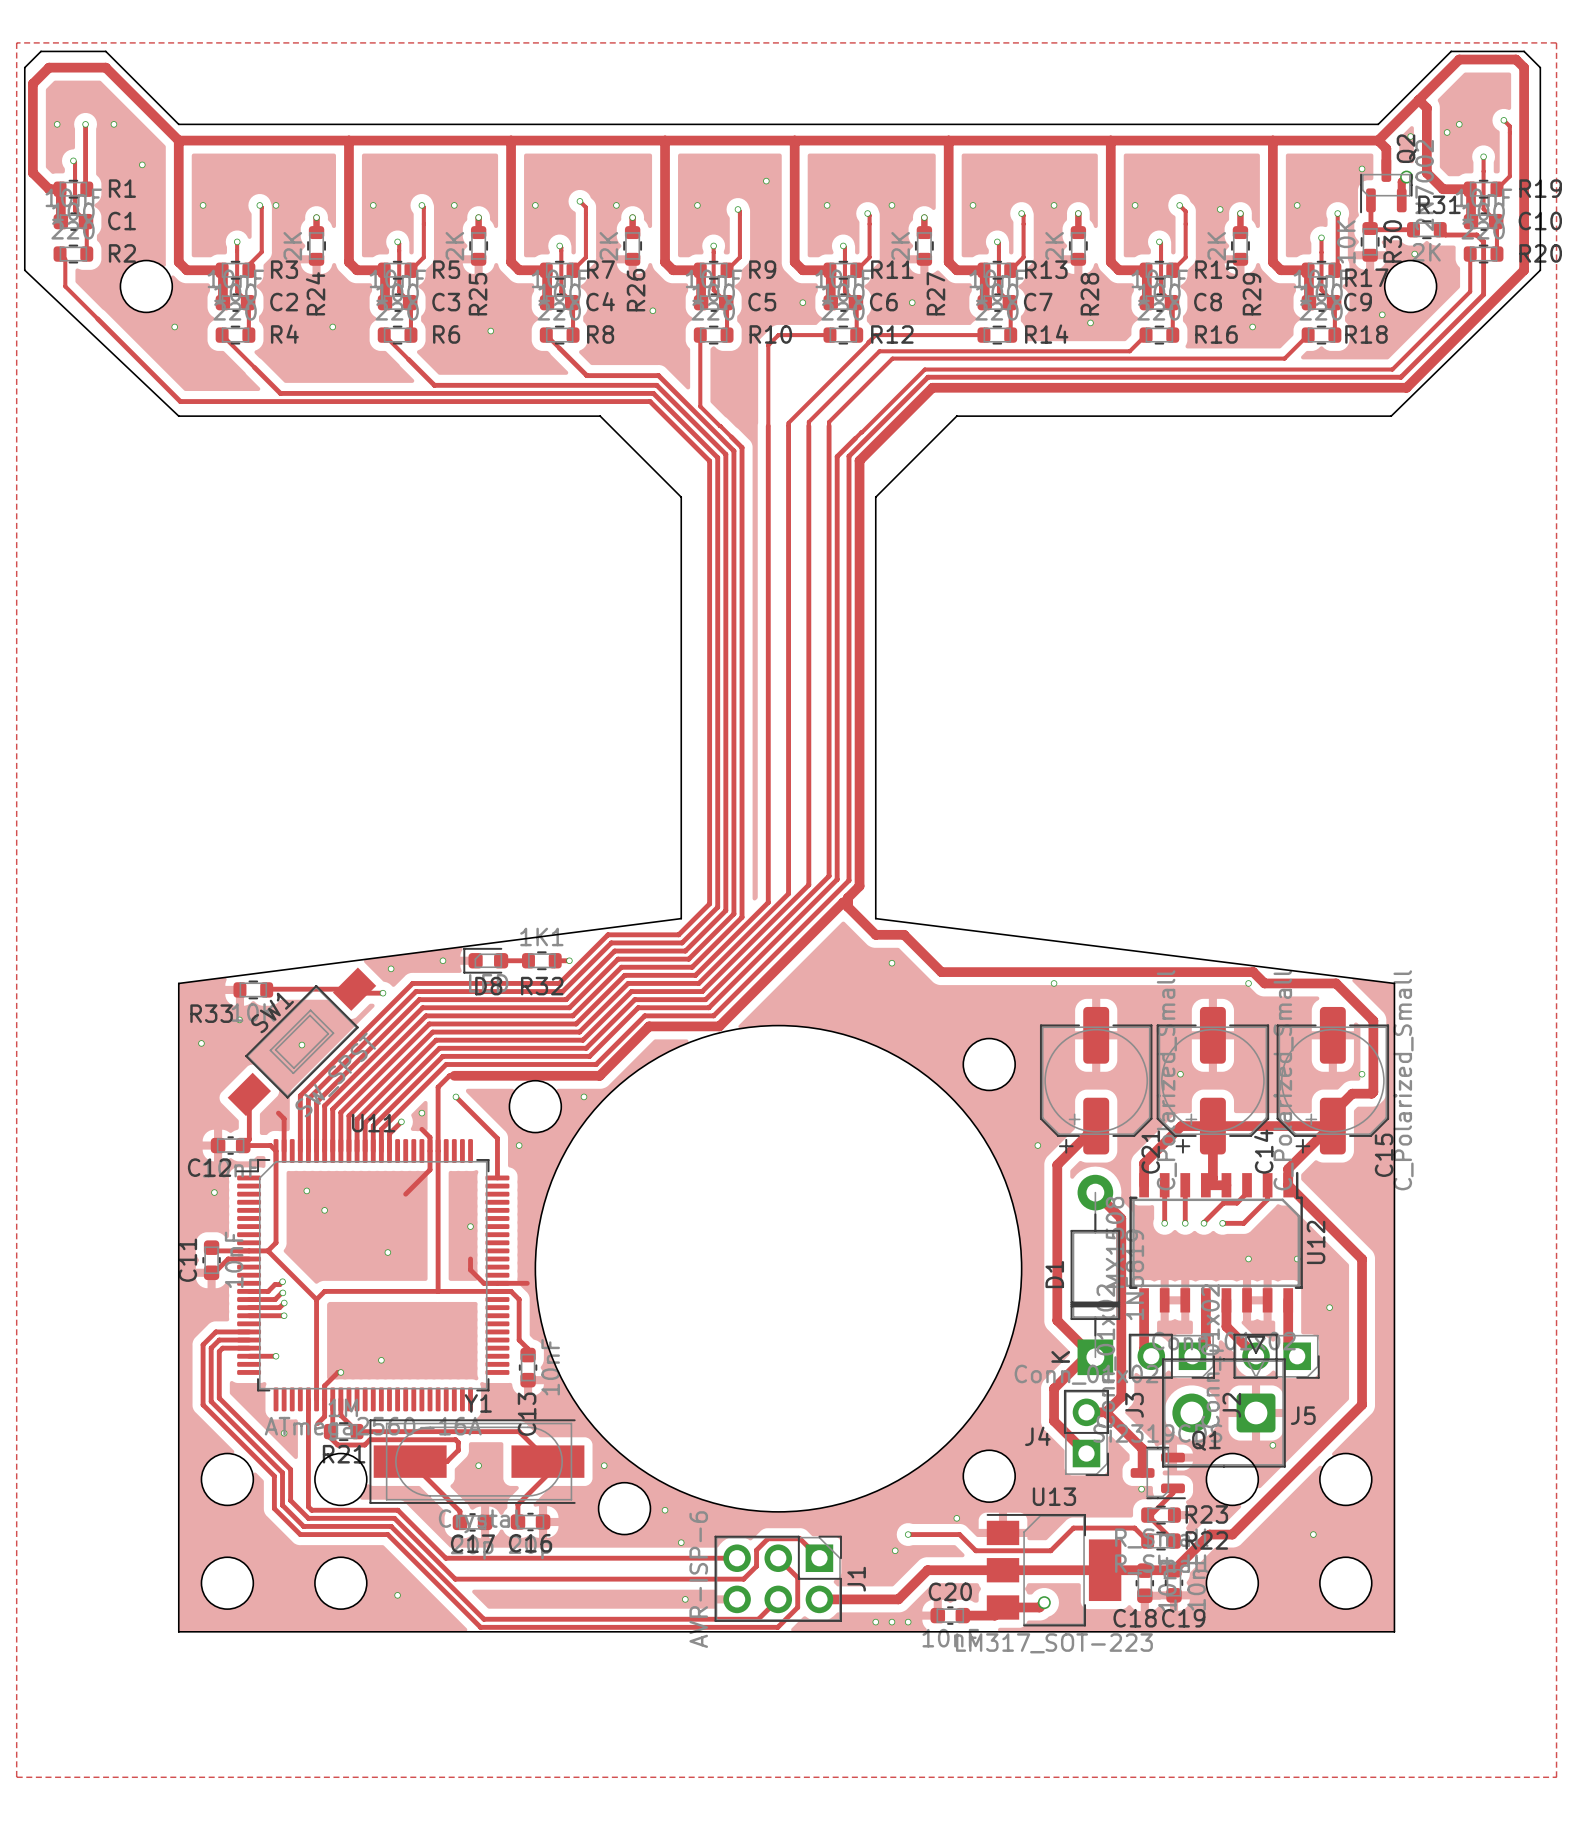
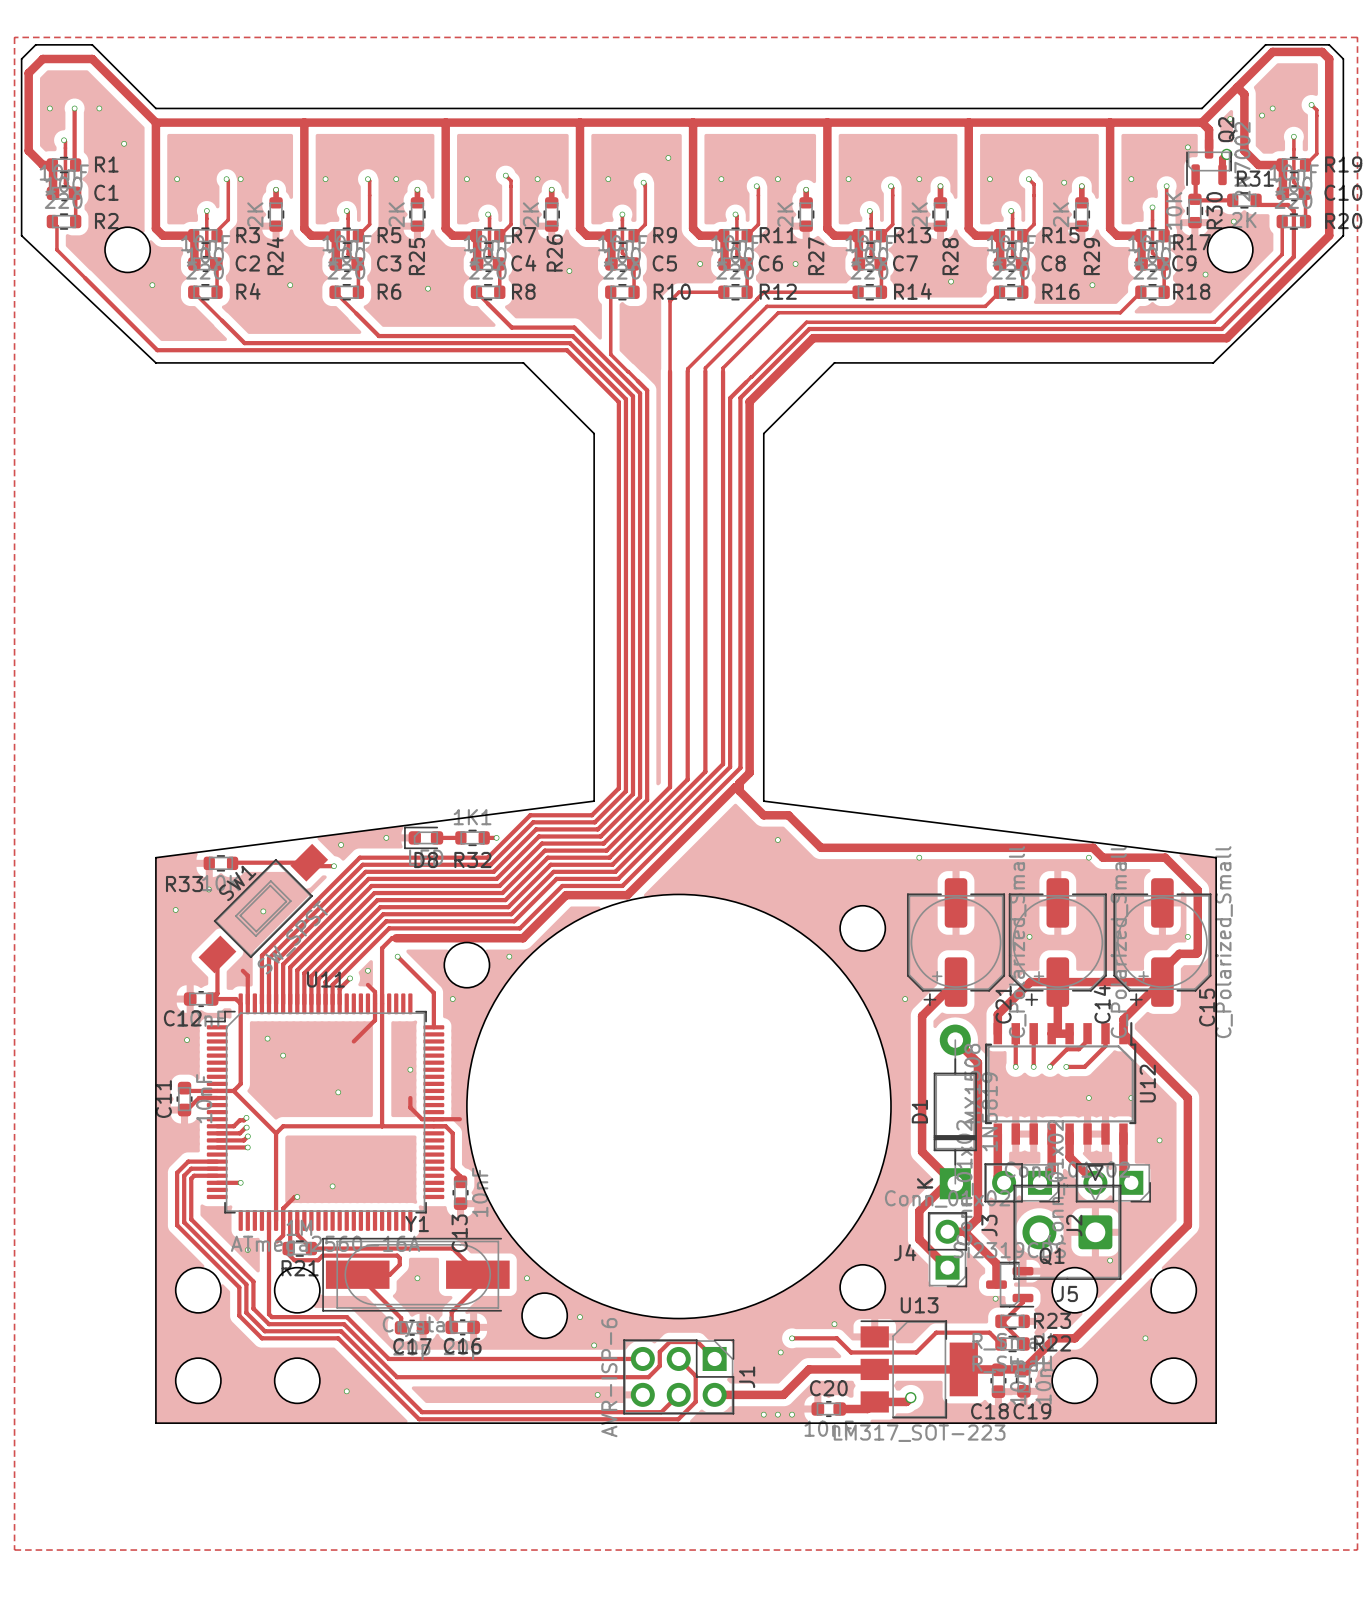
J5 name position: J5 (1303, 1415) -> J5 (1067, 1293)

